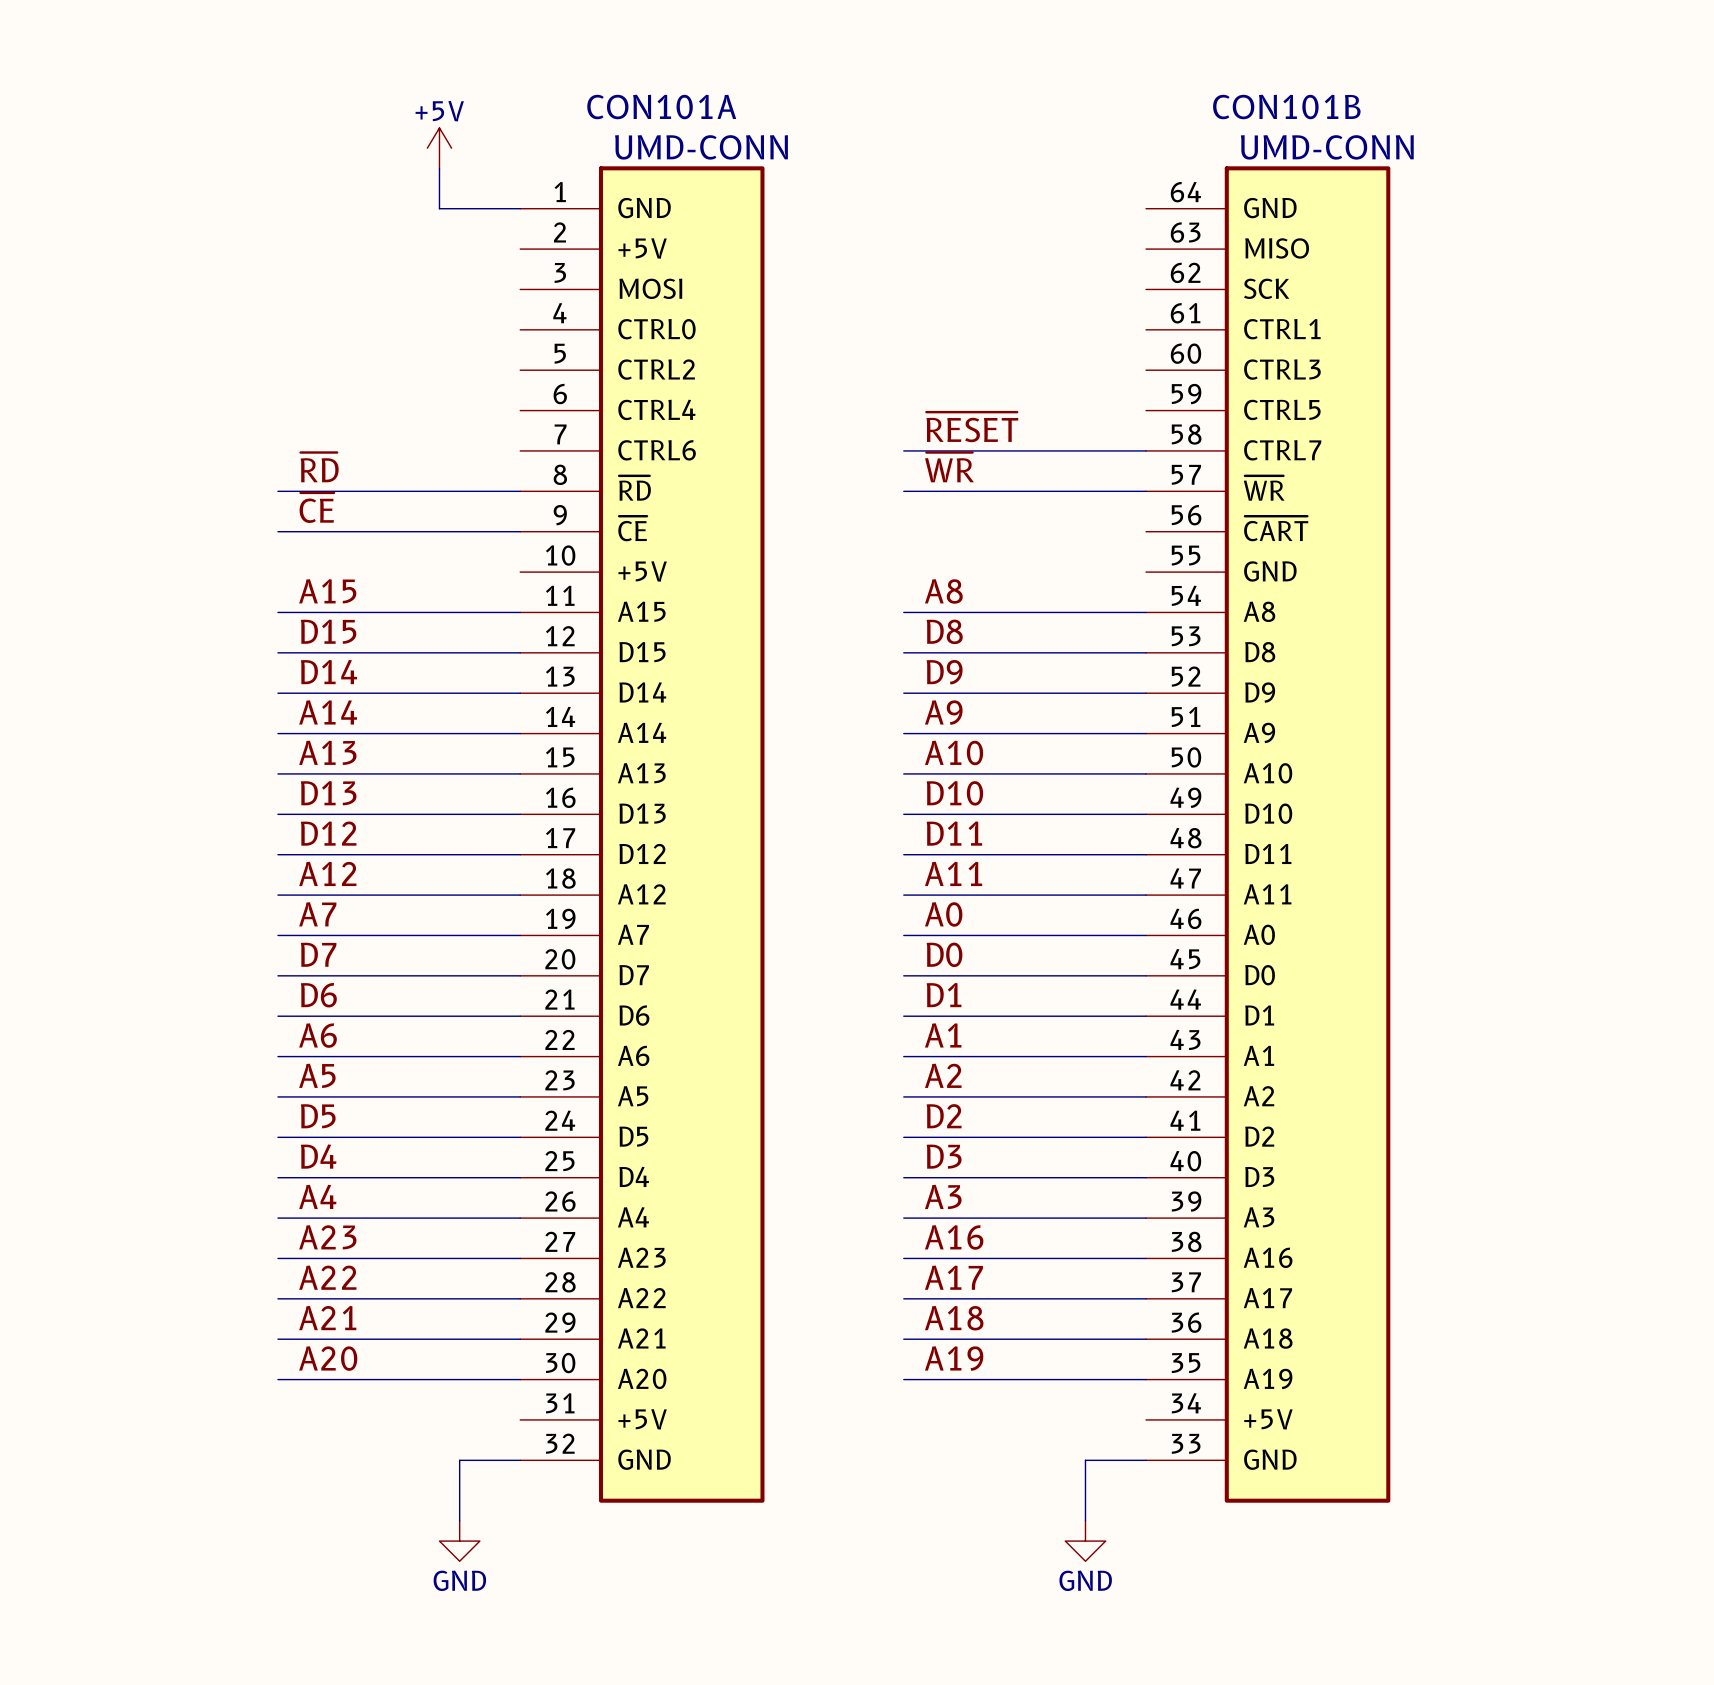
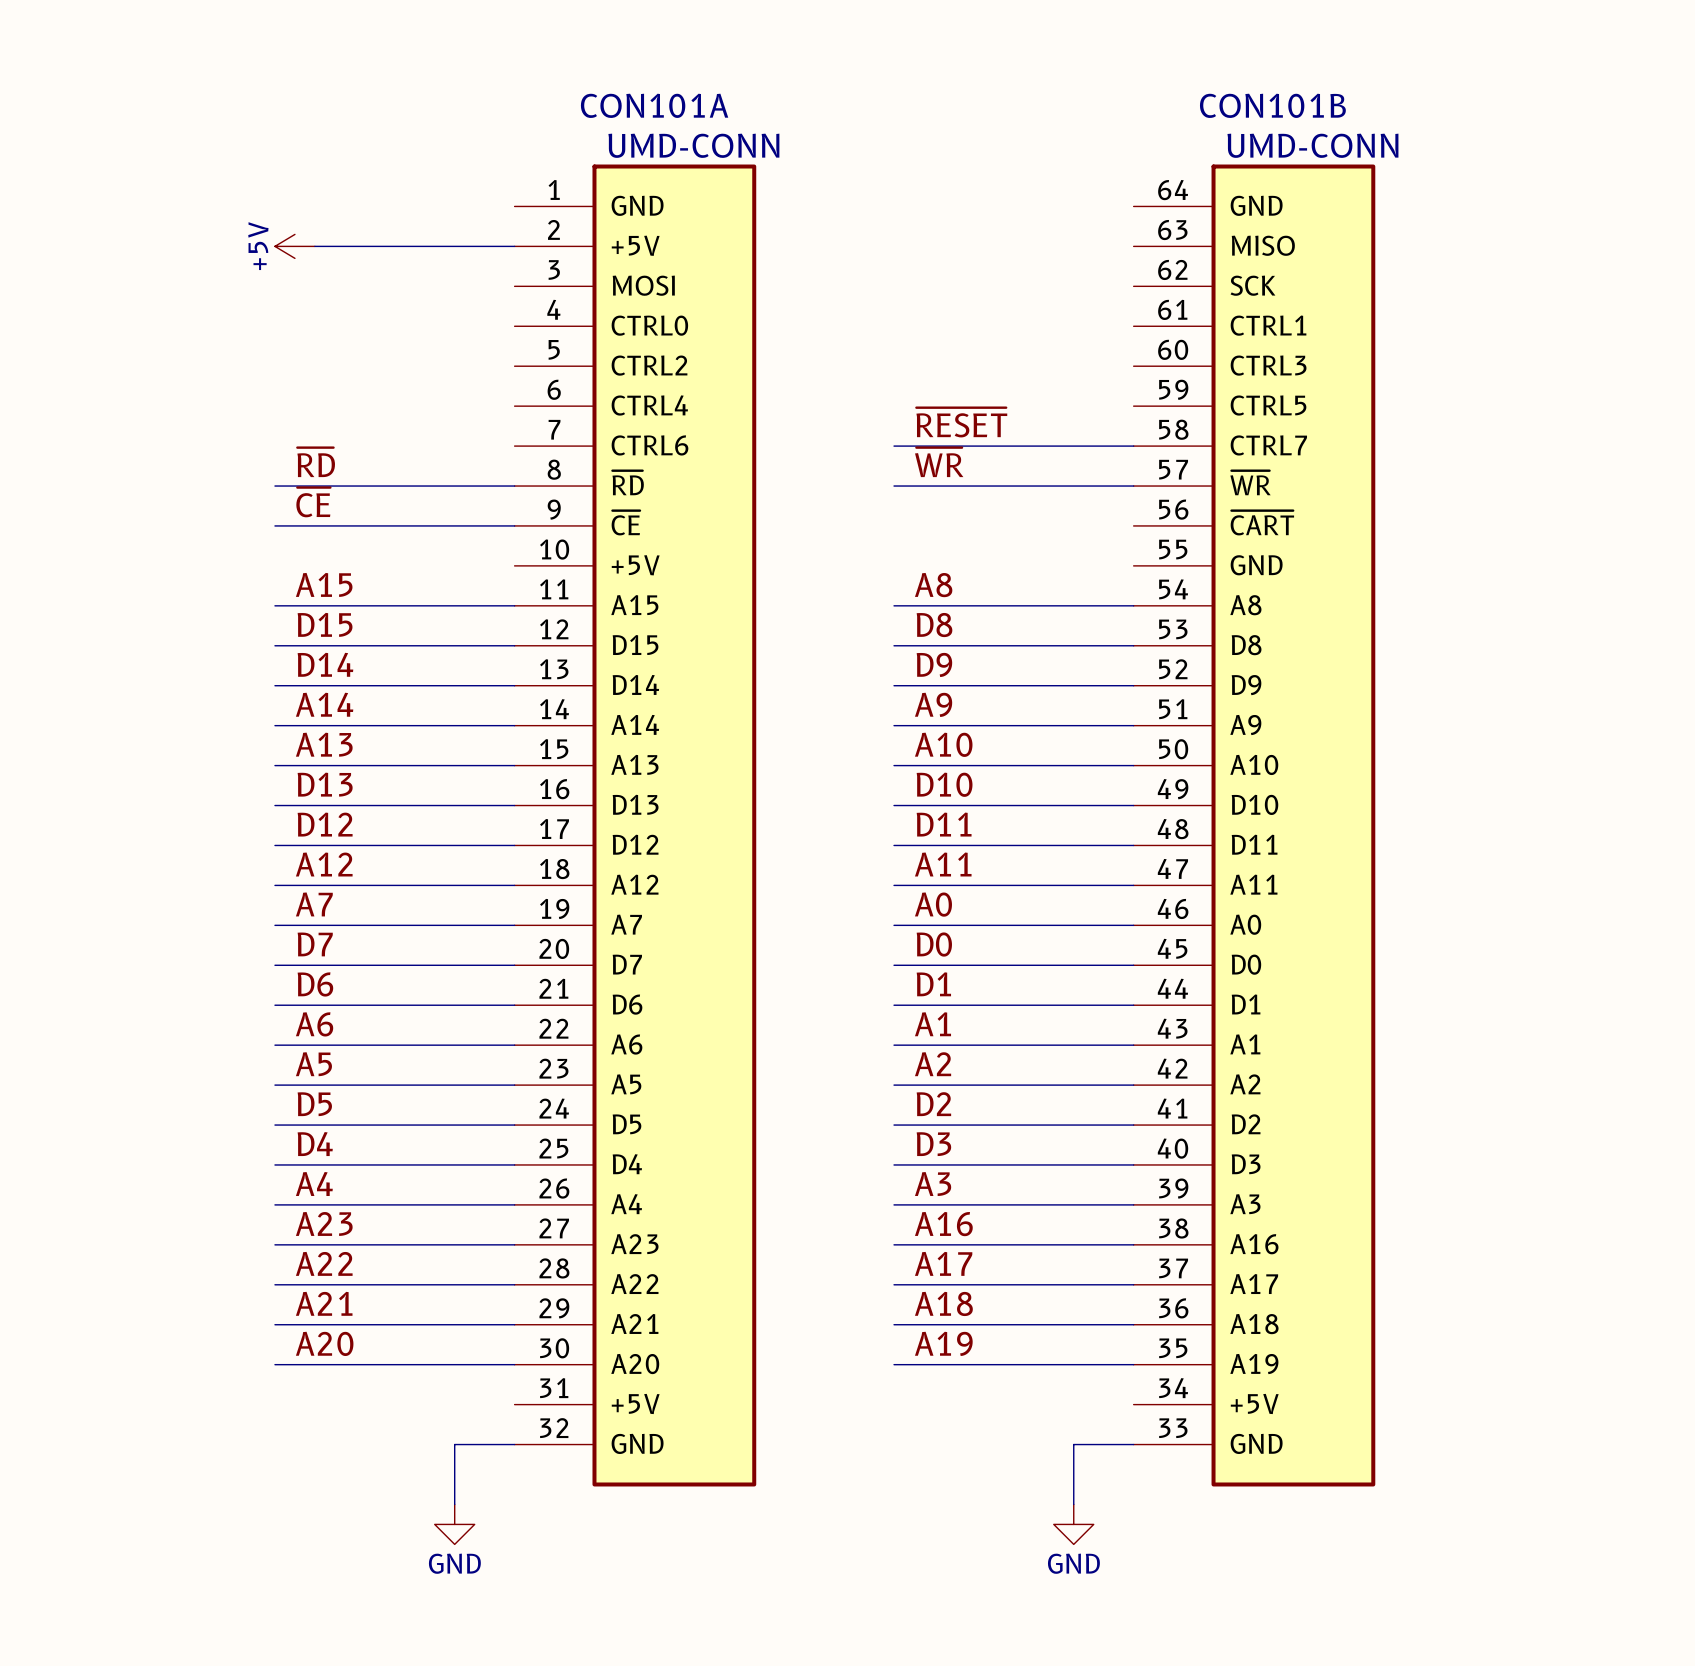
power symbol rotation: 0° (439, 148) -> 90° counterclockwise (294, 246)
power symbol position: +5V (439, 148) -> +5V (294, 246)
wire: (439, 168) (439, 208) (520, 208) -> none
wire: none -> (314, 246) (514, 246)

